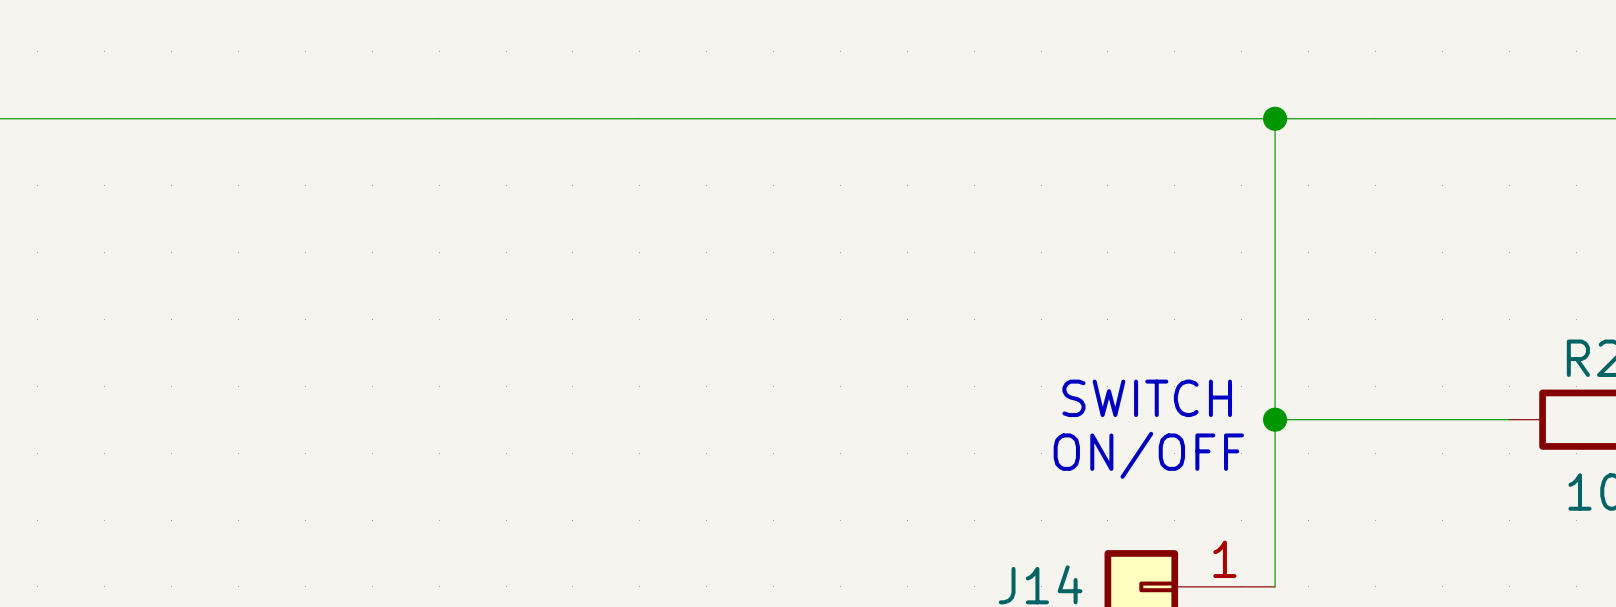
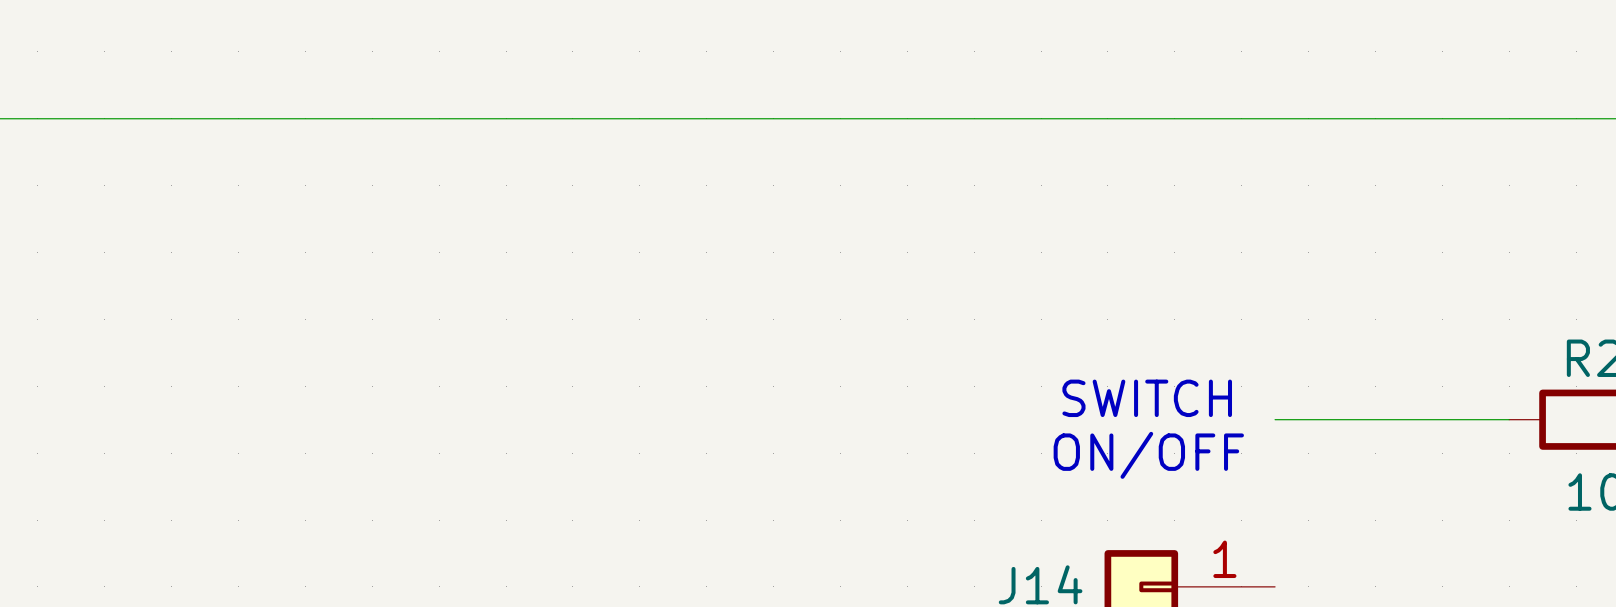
wire: (1275, 118) (1275, 586) -> none
junction: (1275, 118) -> none
junction: (1275, 419) -> none

